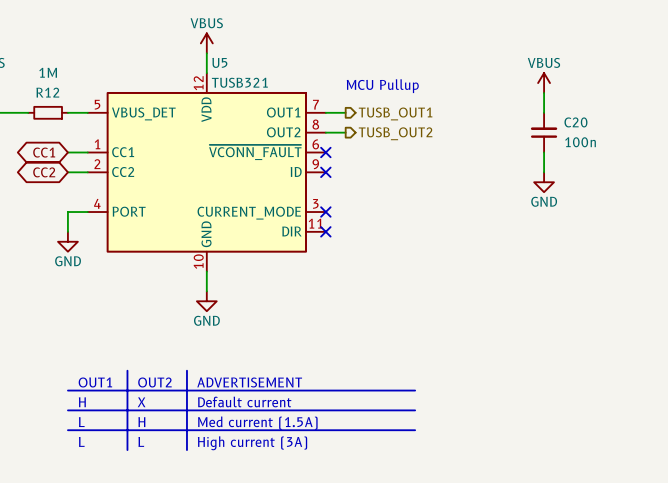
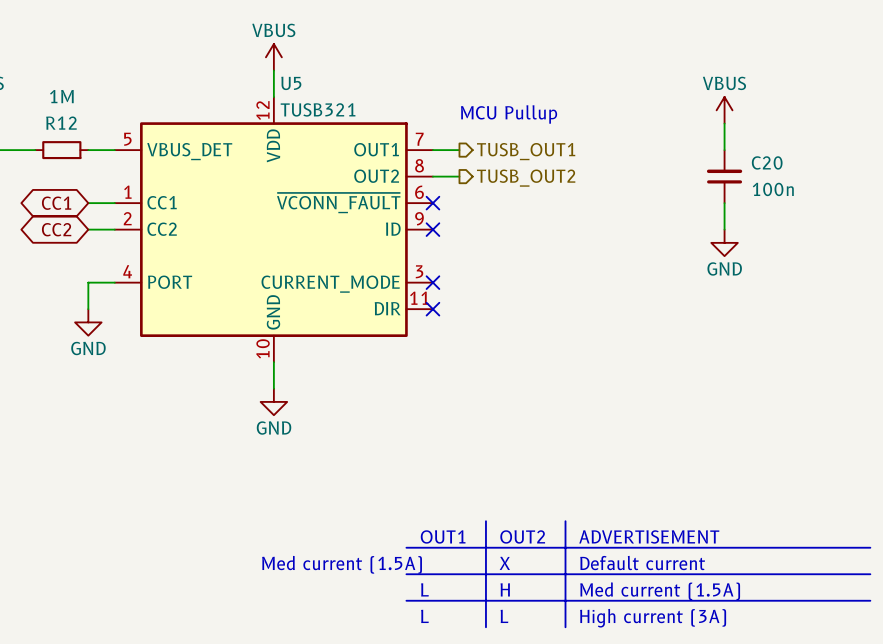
line: (127, 370) (127, 450) -> none
line: (186, 370) (186, 450) -> (485, 521) (485, 627)
text: OUT1 (95, 382) -> none
text: OUT2 (154, 382) -> none
text: ADVERTISEMENT (249, 382) -> none
line: (67, 390) (415, 390) -> none
line: none -> (565, 521) (565, 627)
text: Default current (244, 401) -> none
text: H (82, 402) -> none
text: X (141, 402) -> none
text: none -> OUT1 (443, 536)
text: none -> OUT2 (522, 536)
text: none -> ADVERTISEMENT (649, 536)
line: (67, 410) (306, 410) -> none
line: none -> (552, 547) (870, 547)
text: none -> Default current (642, 563)
text: L (81, 422) -> none
text: H (141, 422) -> none
text: none -> X (504, 563)
line: (67, 430) (306, 430) -> none
line: none -> (552, 574) (870, 574)
text: L (81, 441) -> none
text: L (141, 441) -> none
text: none -> L (424, 589)
text: none -> H (505, 589)
text: none -> Med current (1.5A) (660, 591)
text: High current (3A) (252, 443) -> none
line: none -> (406, 600) (870, 600)
text: none -> L (424, 616)
text: none -> L (504, 616)
text: none -> High current (3A) (653, 618)

